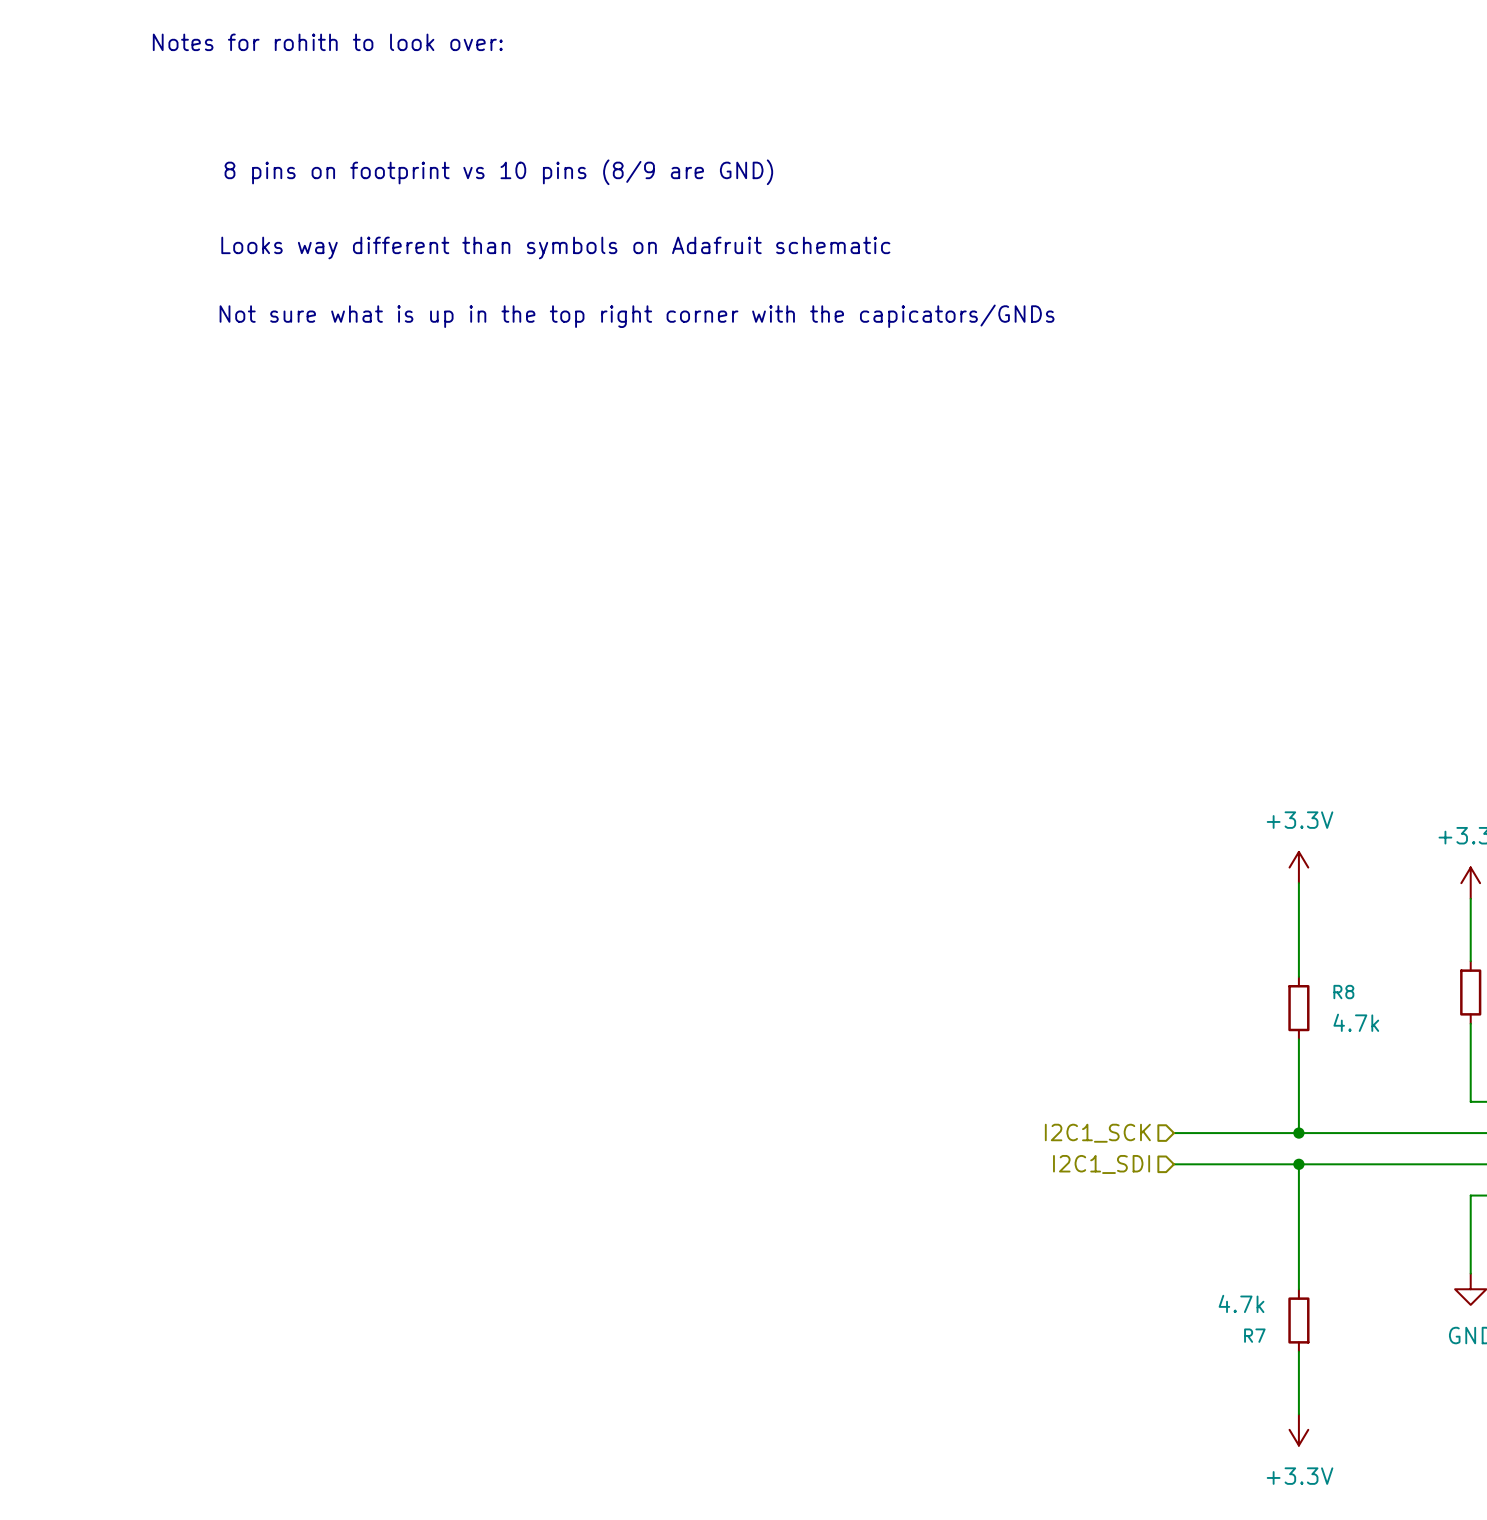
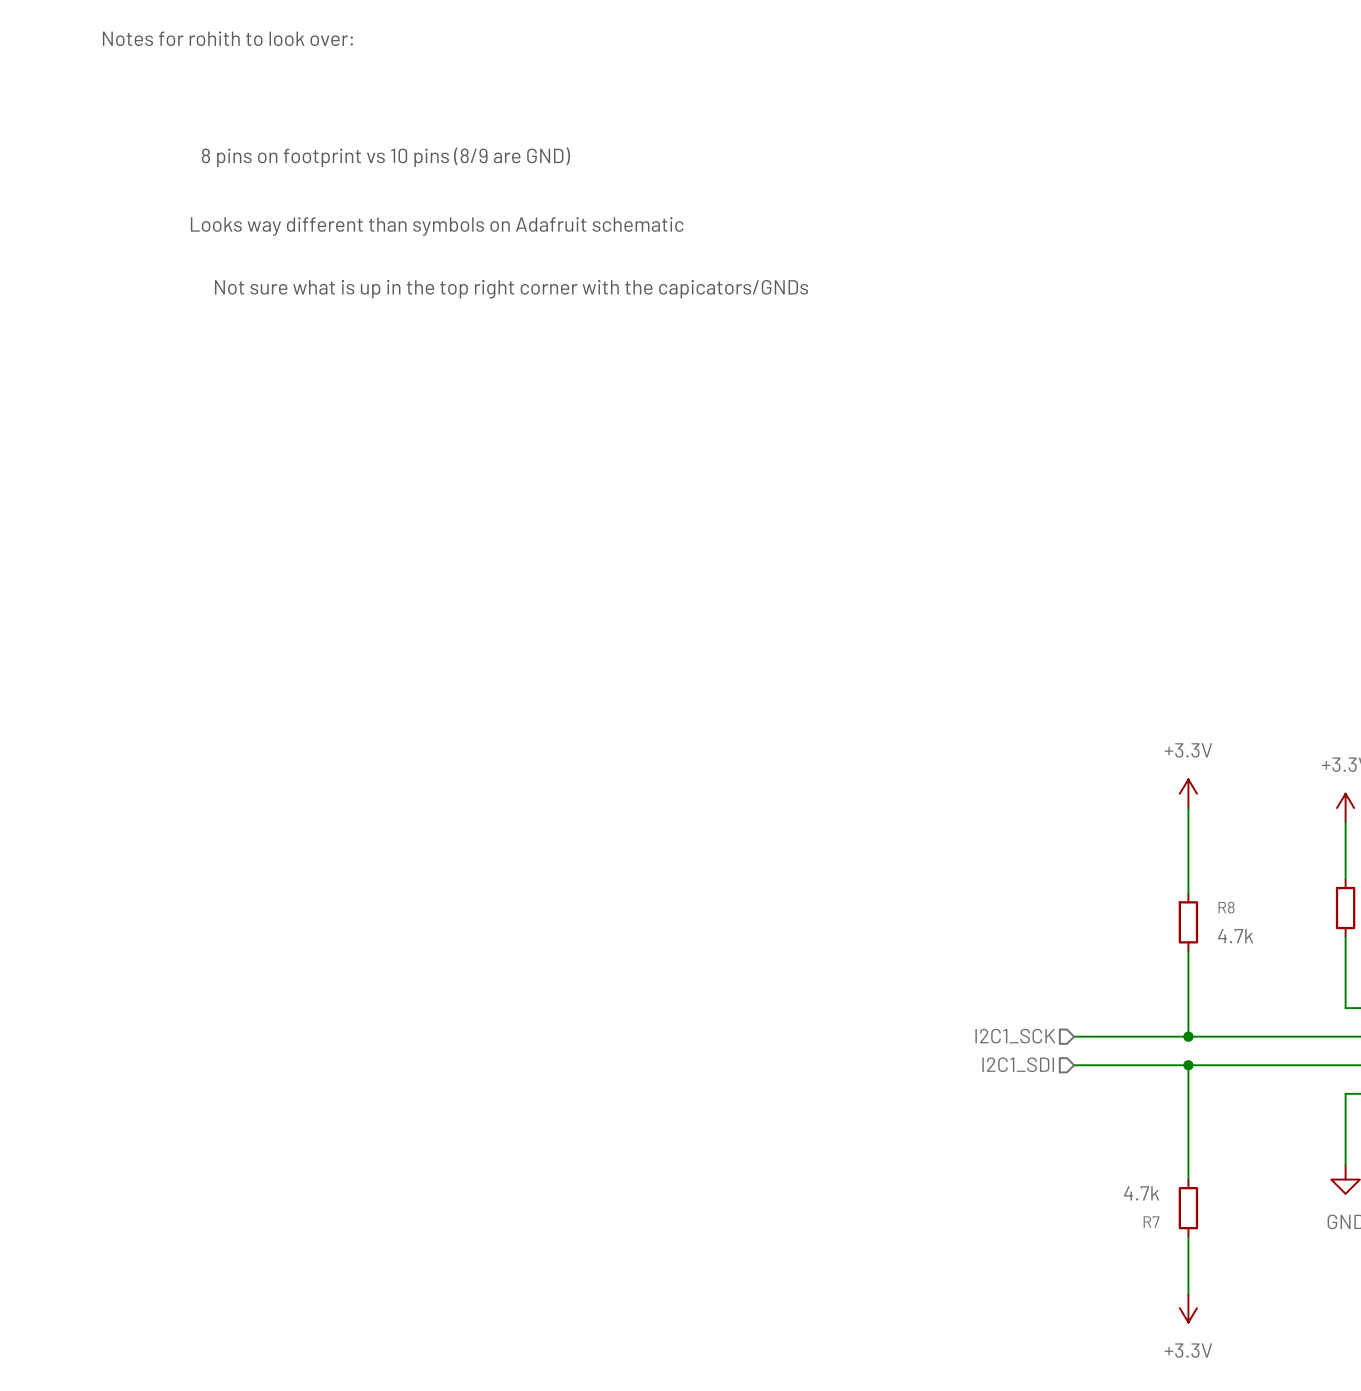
text position: Notes for rohith to look over: (327, 42) -> Notes for rohith to look over: (227, 38)
text position: 8 pins on footprint vs 10 pins (8/9 are GND) (498, 172) -> 8 pins on footprint vs 10 pins (8/9 are GND) (385, 157)
text position: Looks way different than symbols on Adafruit schematic (555, 247) -> Looks way different than symbols on Adafruit schematic (437, 226)
text position: Not sure what is up in the top right corner with the capicators/GNDs (637, 316) -> Not sure what is up in the top right corner with the capicators/GNDs (511, 289)

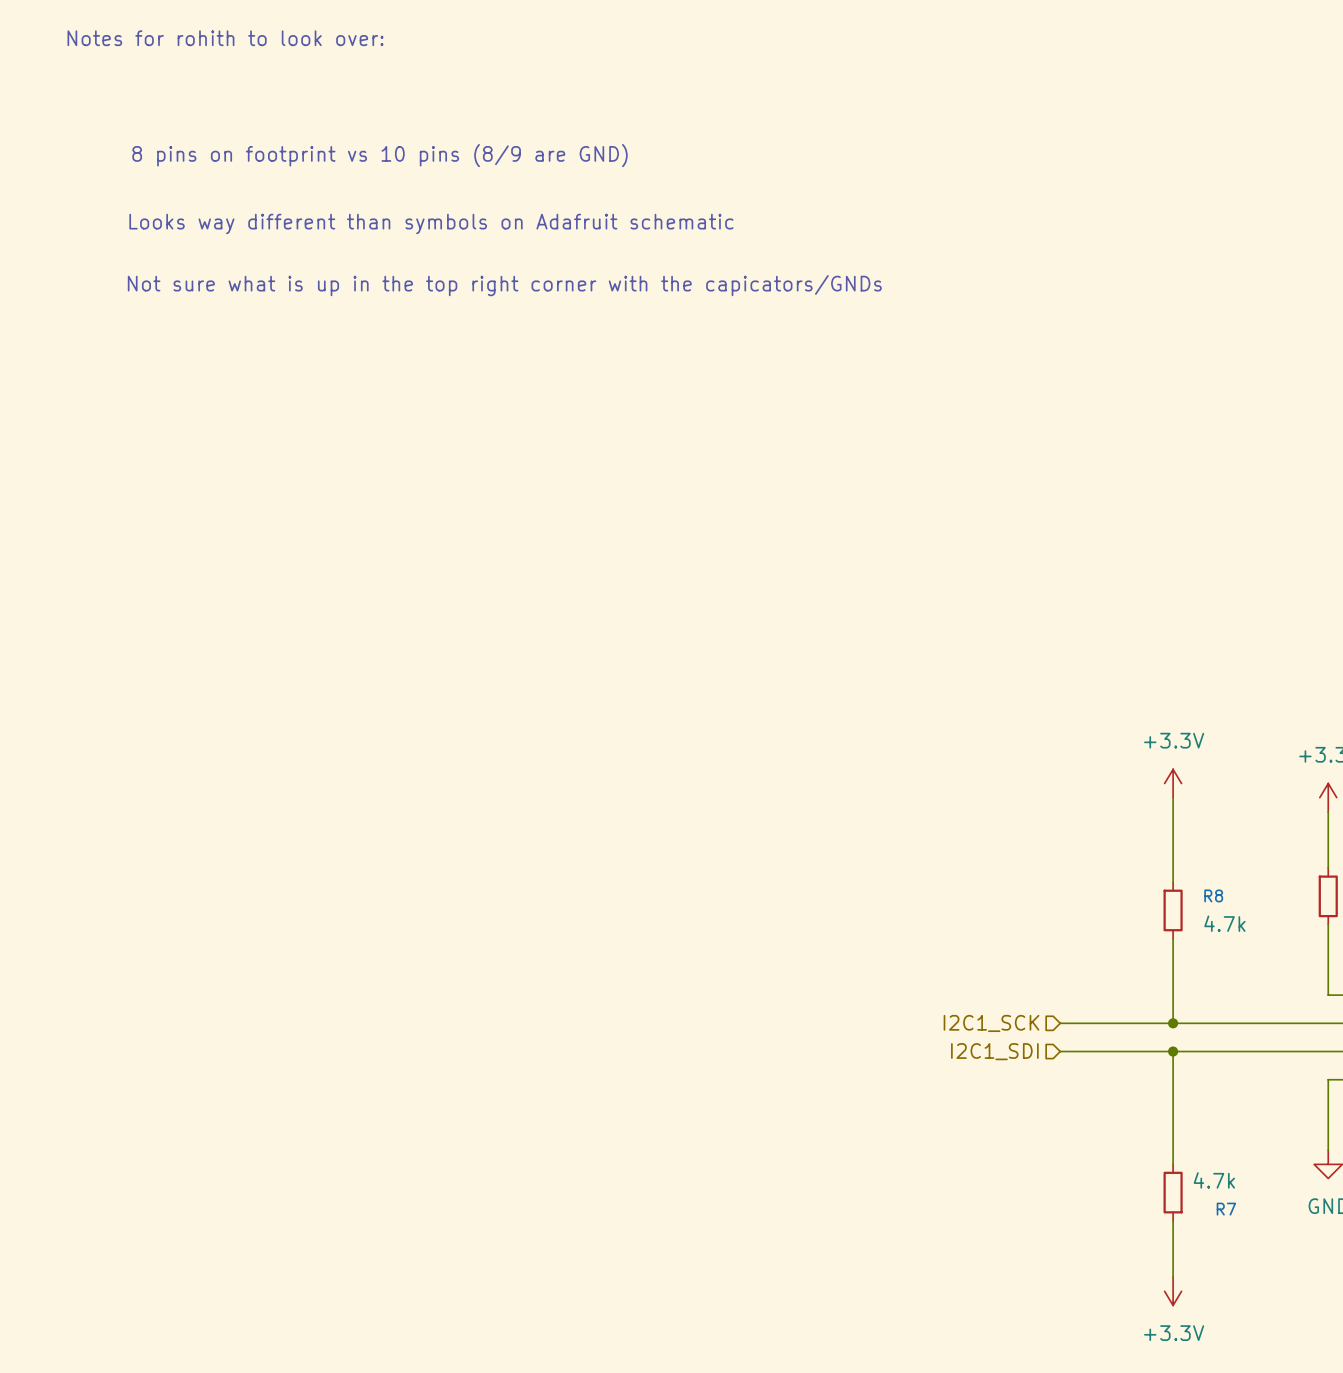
R7 value position: 4.7k (1141, 1193) -> 4.7k (1214, 1180)
R7 name position: R7 (1151, 1222) -> R7 (1226, 1209)

